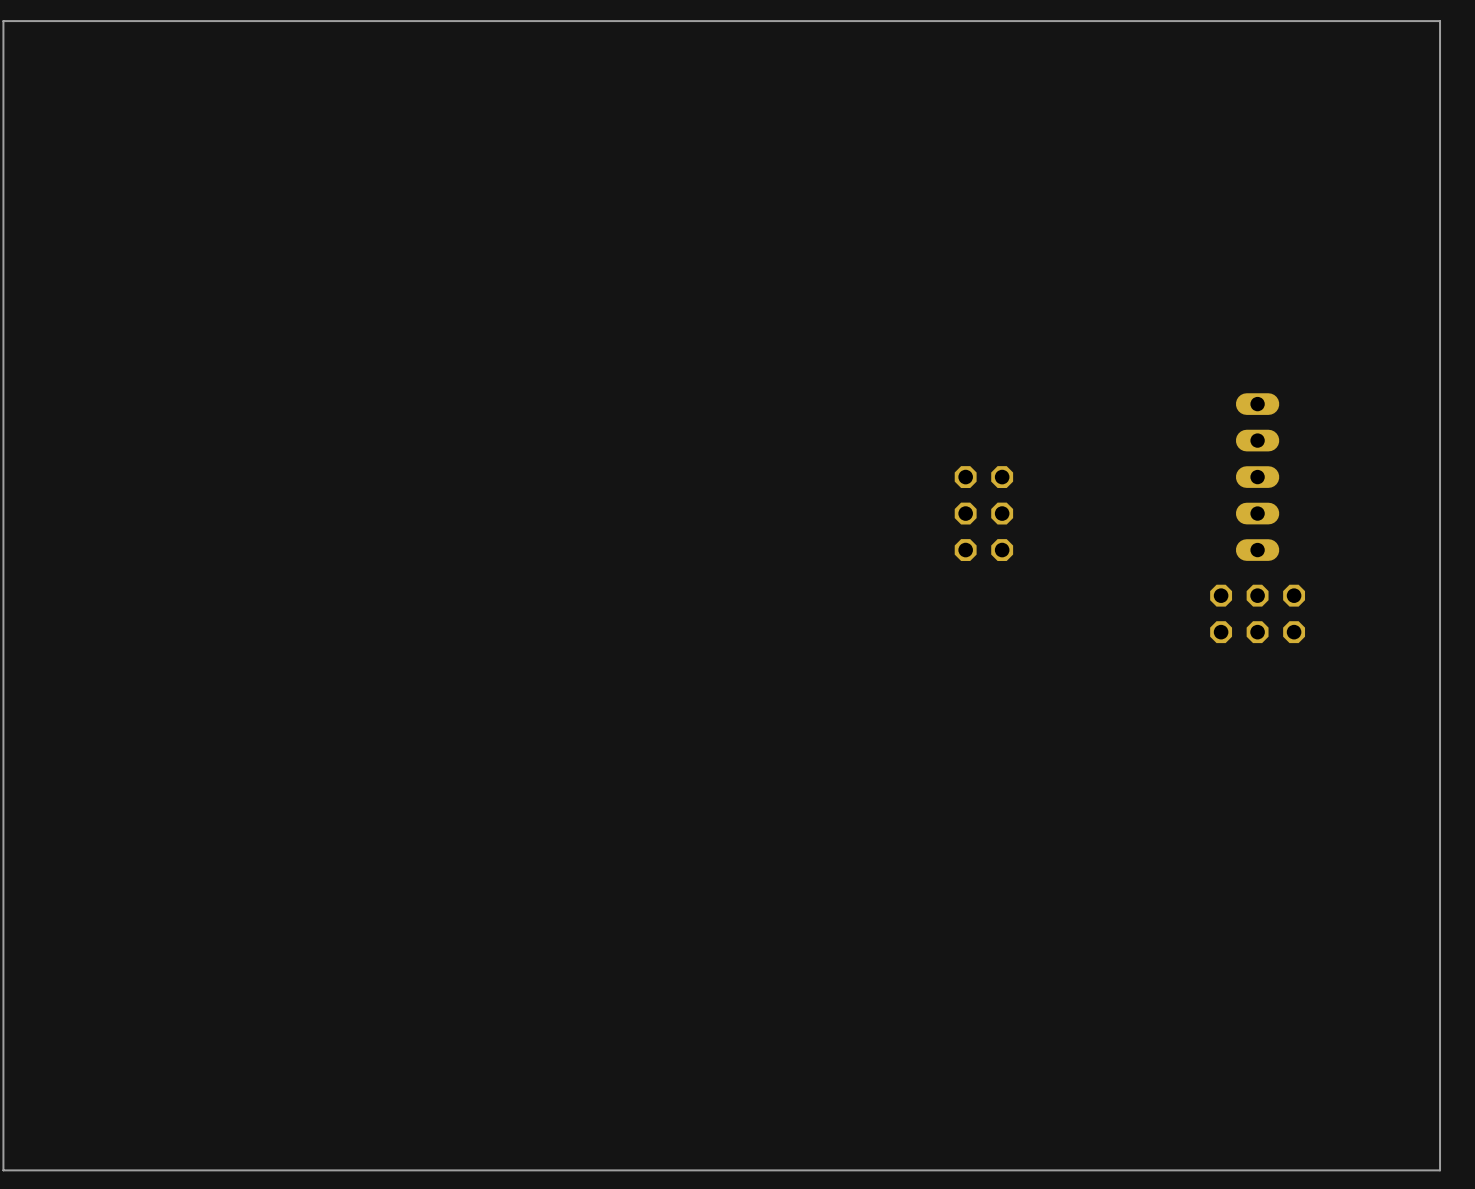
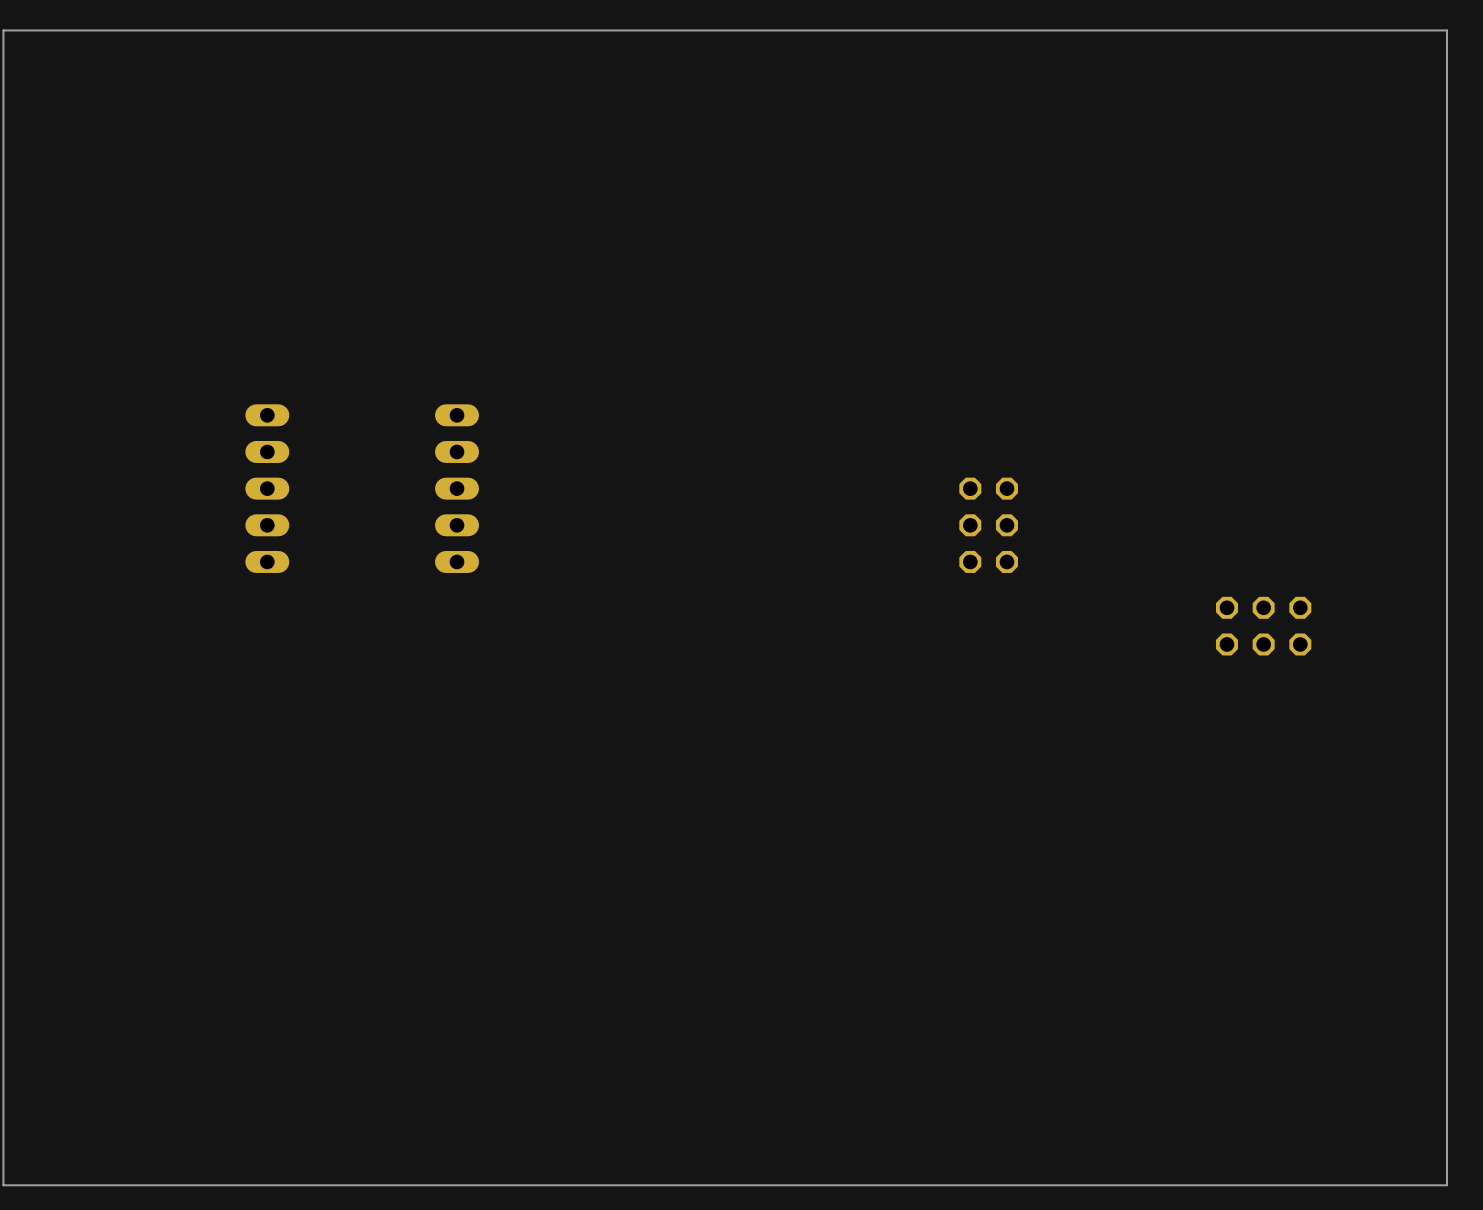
part: none -> (267, 488)
part: none -> (457, 488)
part: (1257, 477) -> none

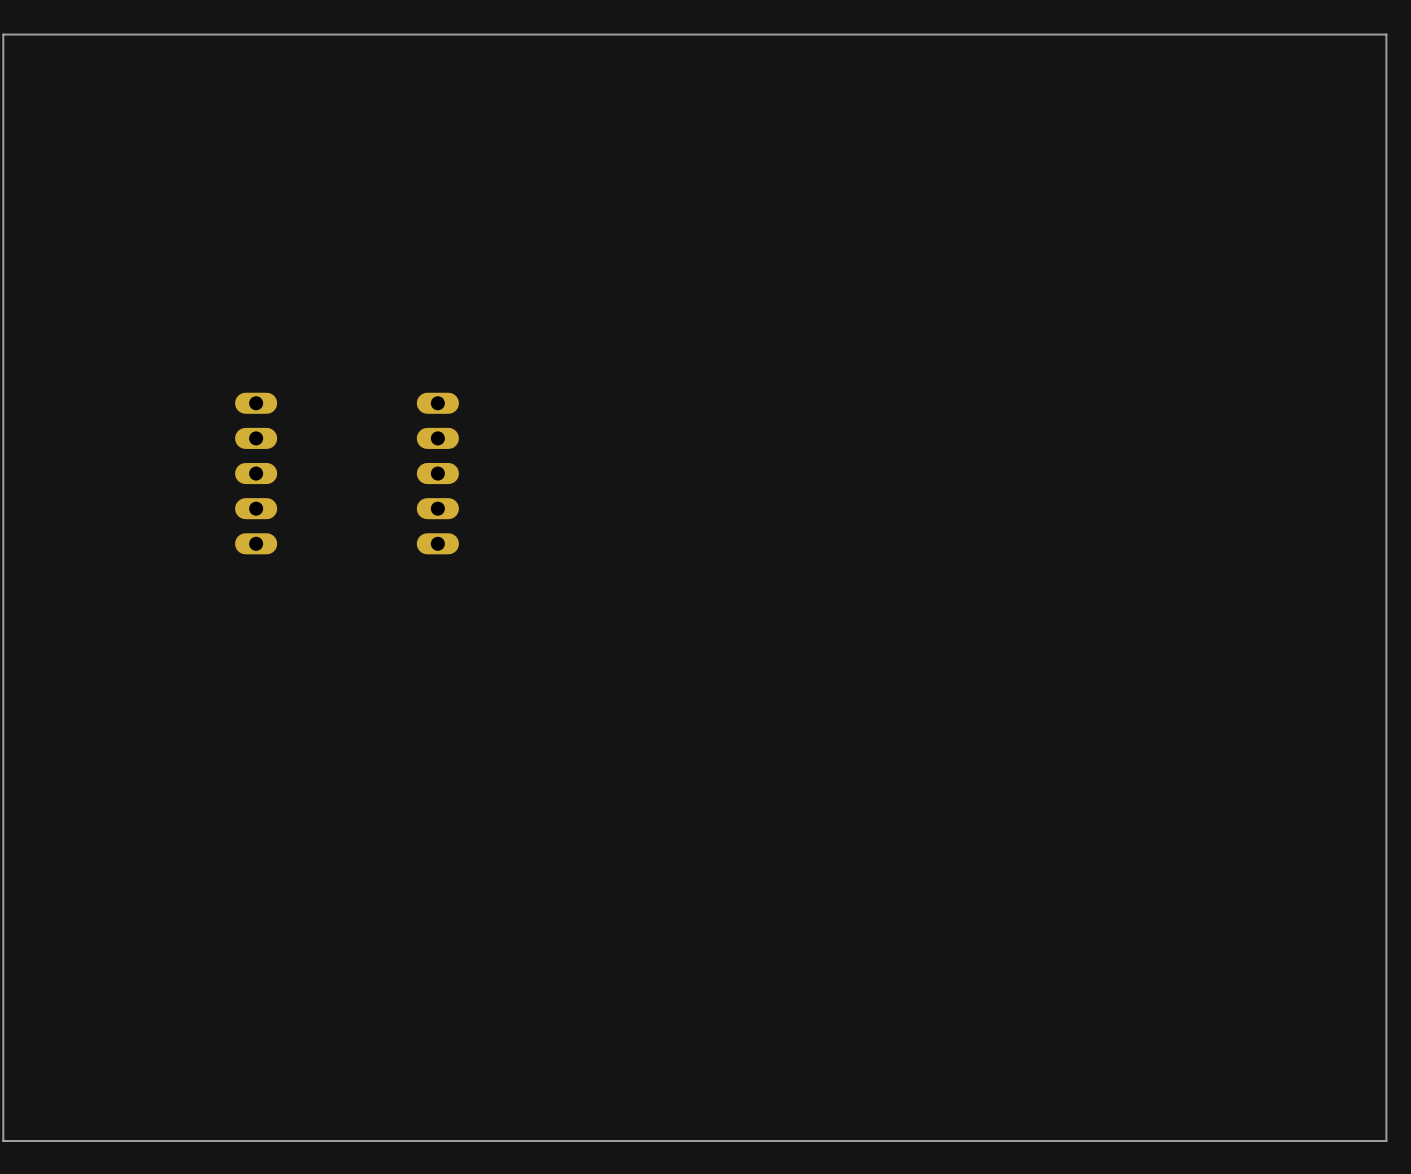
part: (988, 525) -> none
part: (1263, 626) -> none

